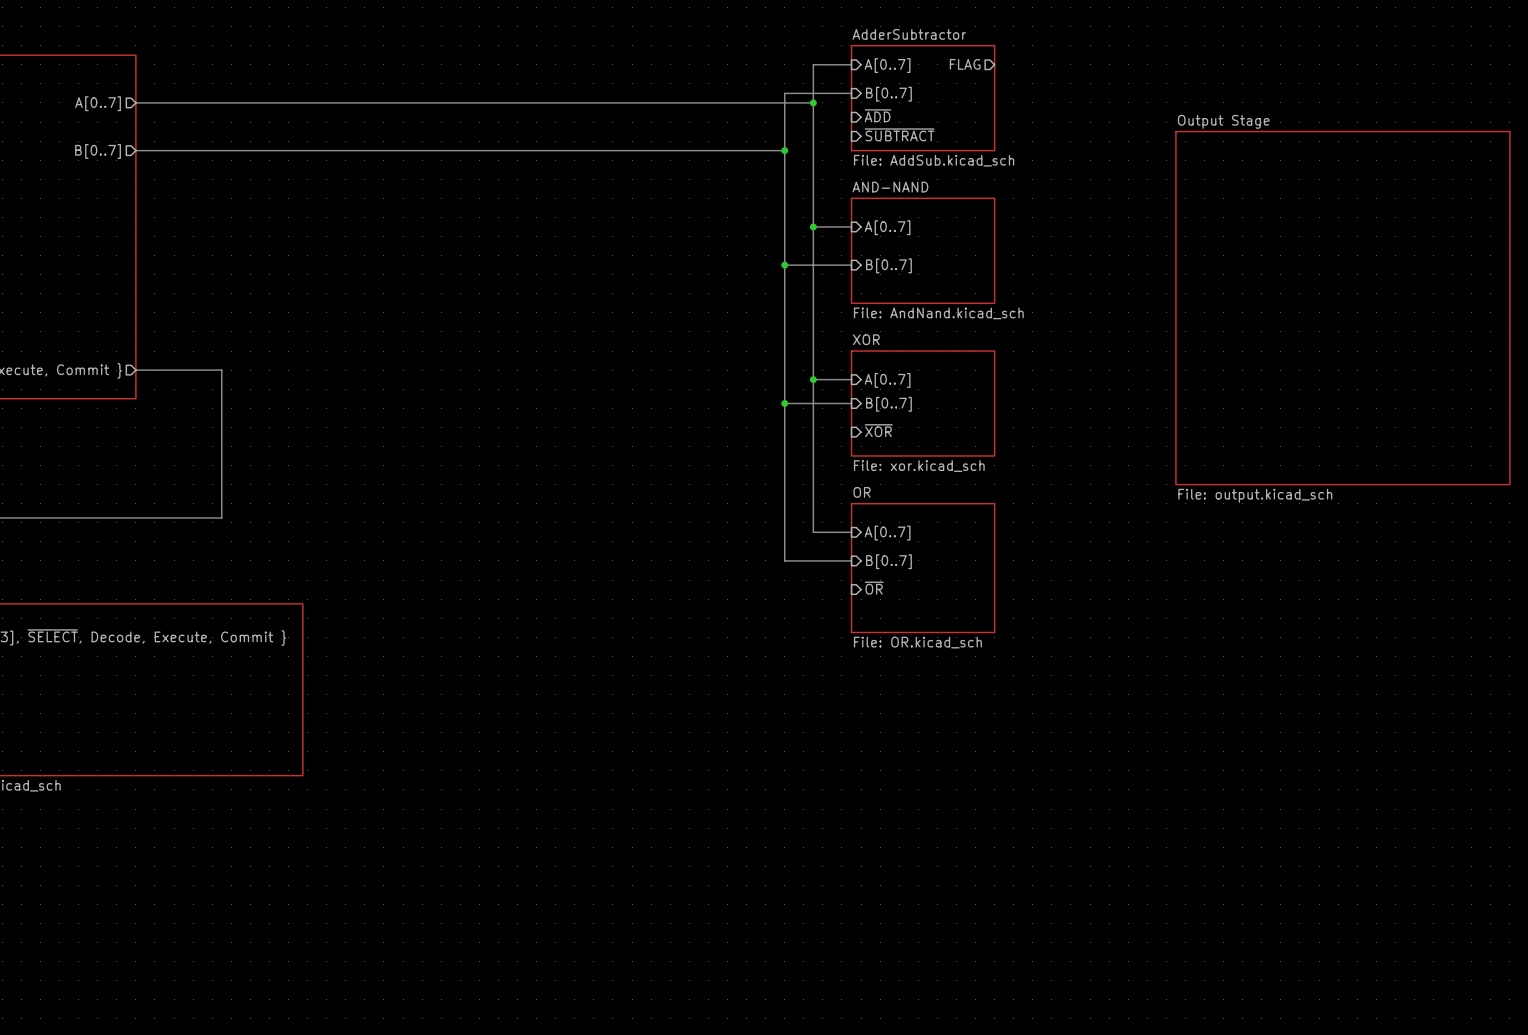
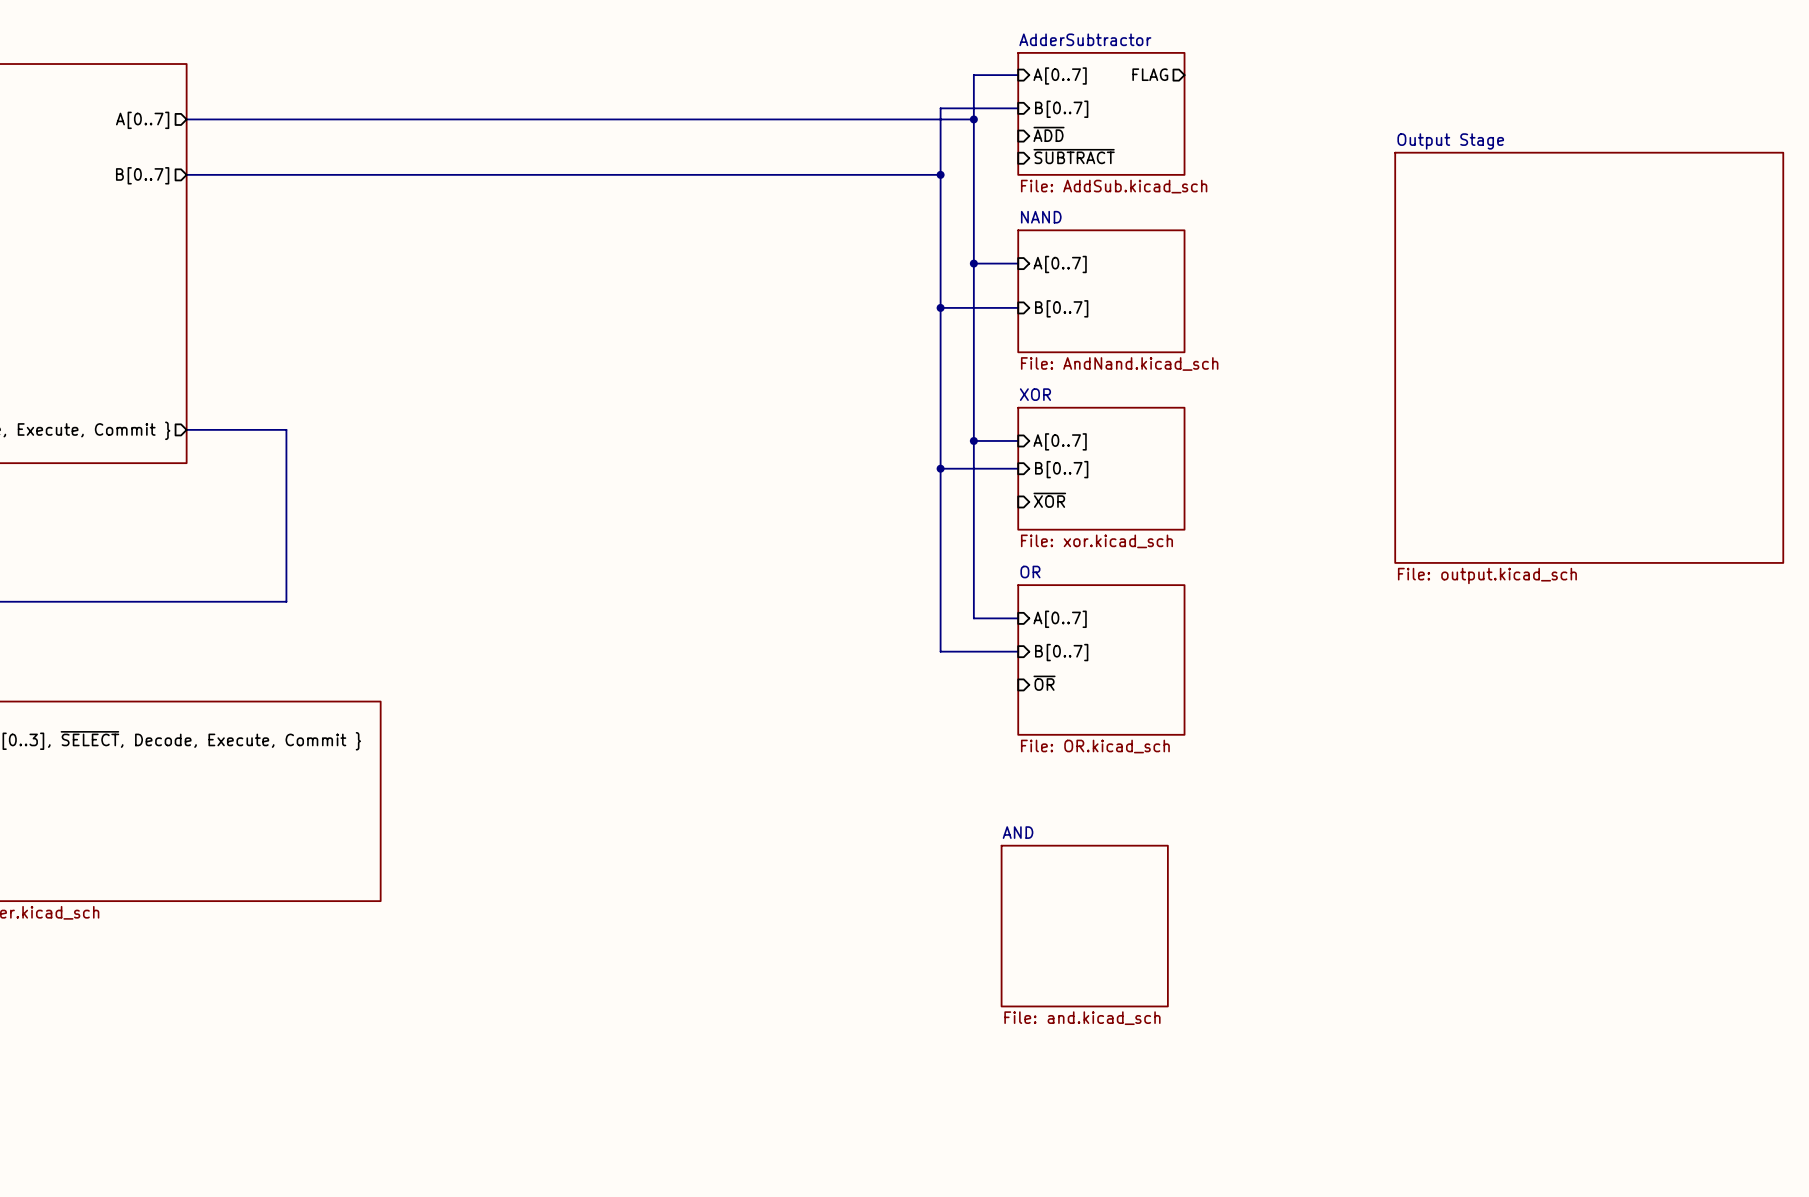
sheet AND-NAND name: AND-NAND (890, 187) -> NAND (1041, 217)
sheet AND: none -> File: and.kicad_sch (1084, 926)

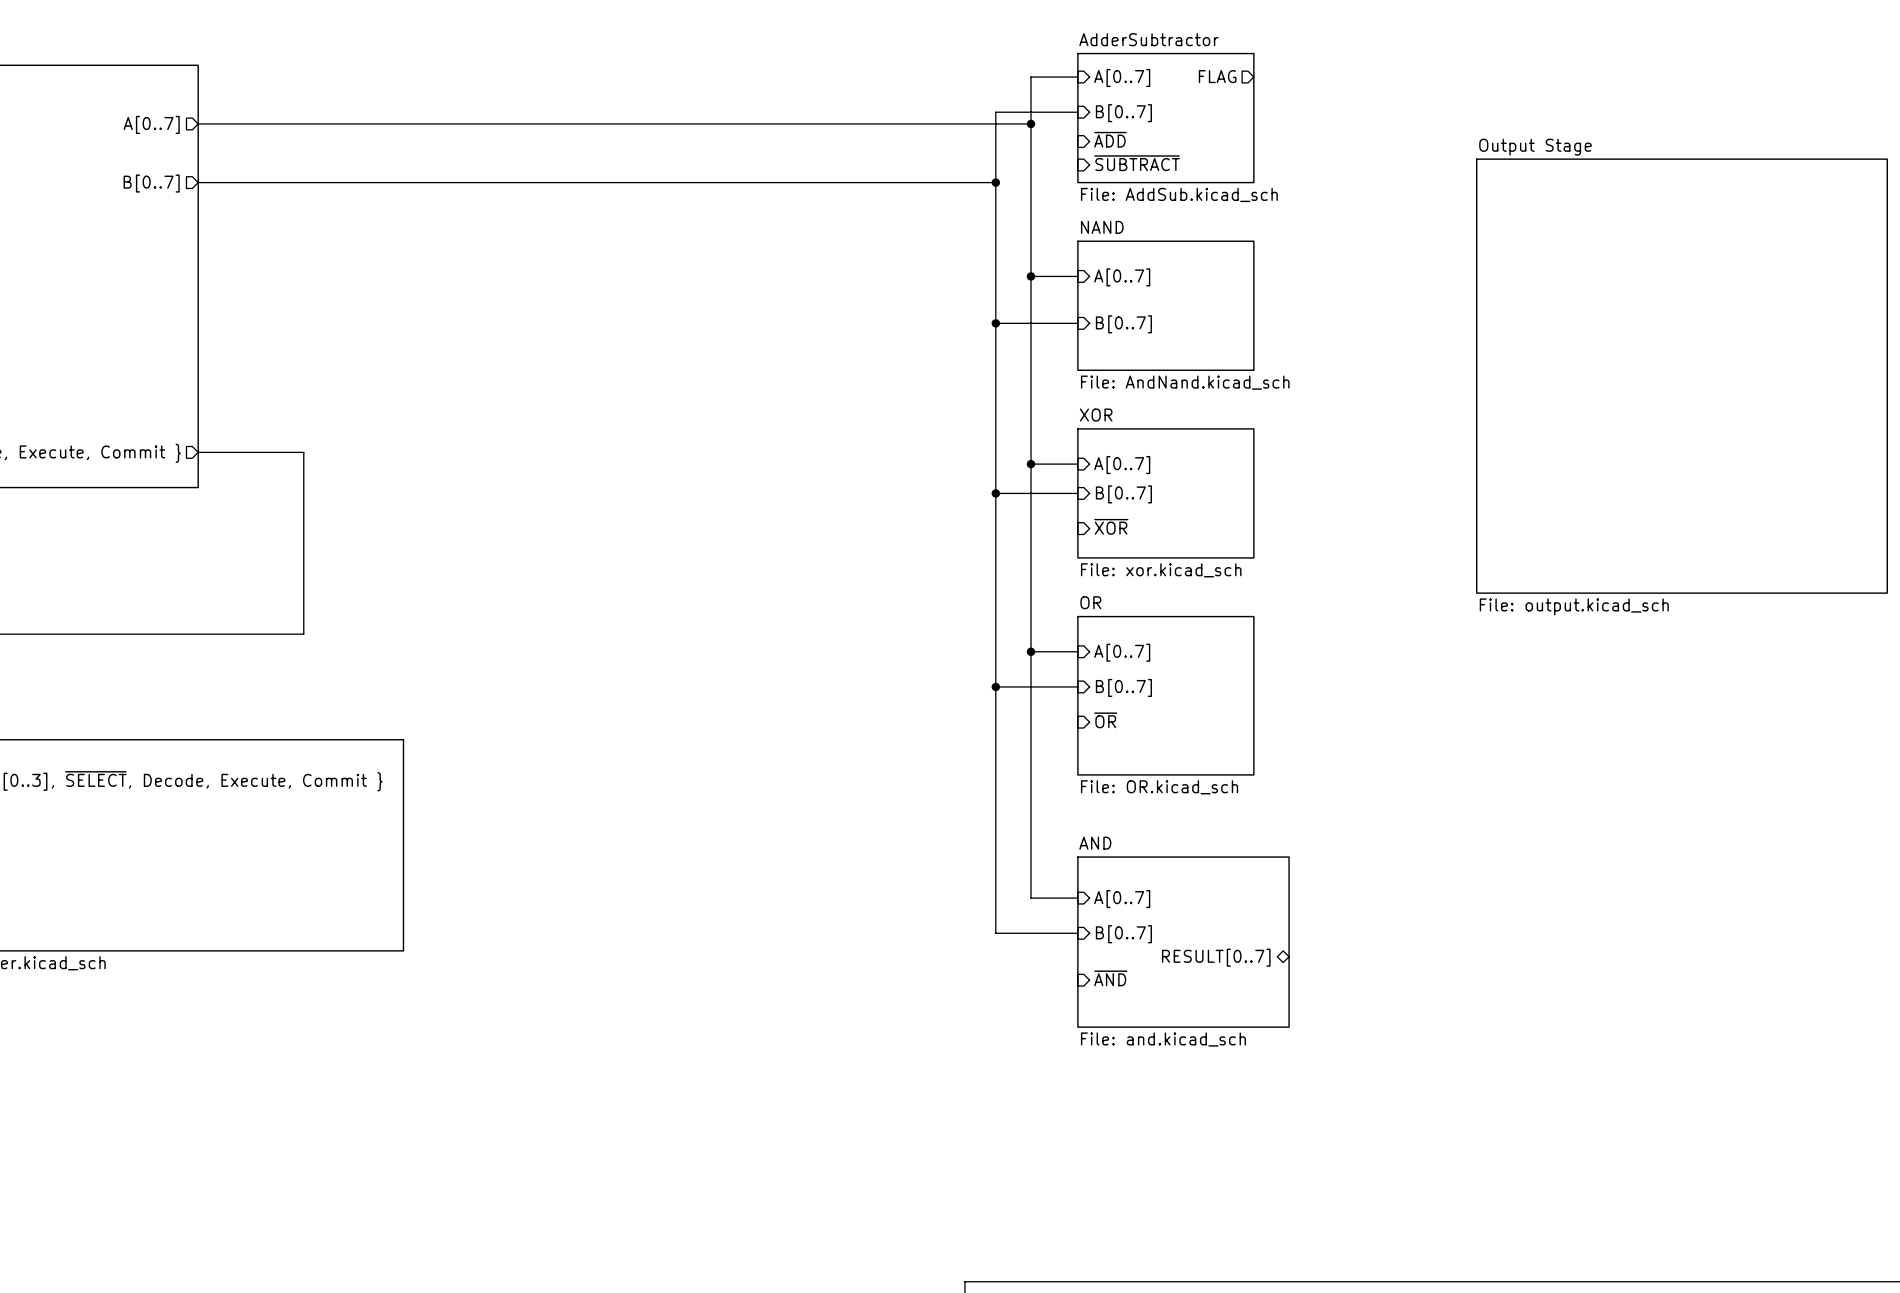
bus: none -> (1031, 651) (1031, 898) (1077, 898)
junction: none -> (1031, 651)
bus: none -> (995, 686) (995, 933) (1077, 933)
junction: none -> (995, 686)
sheet pin: none -> A[0..7] (1122, 899)
sheet pin: none -> B[0..7] (1123, 934)
sheet AND: none -> File: and.kicad_sch (1183, 942)
sheet pin: none -> RESULT[0..7] (1216, 957)
sheet AND: File: and.kicad_sch (1084, 926) -> none
sheet pin: none -> ~{AND} (1110, 978)

